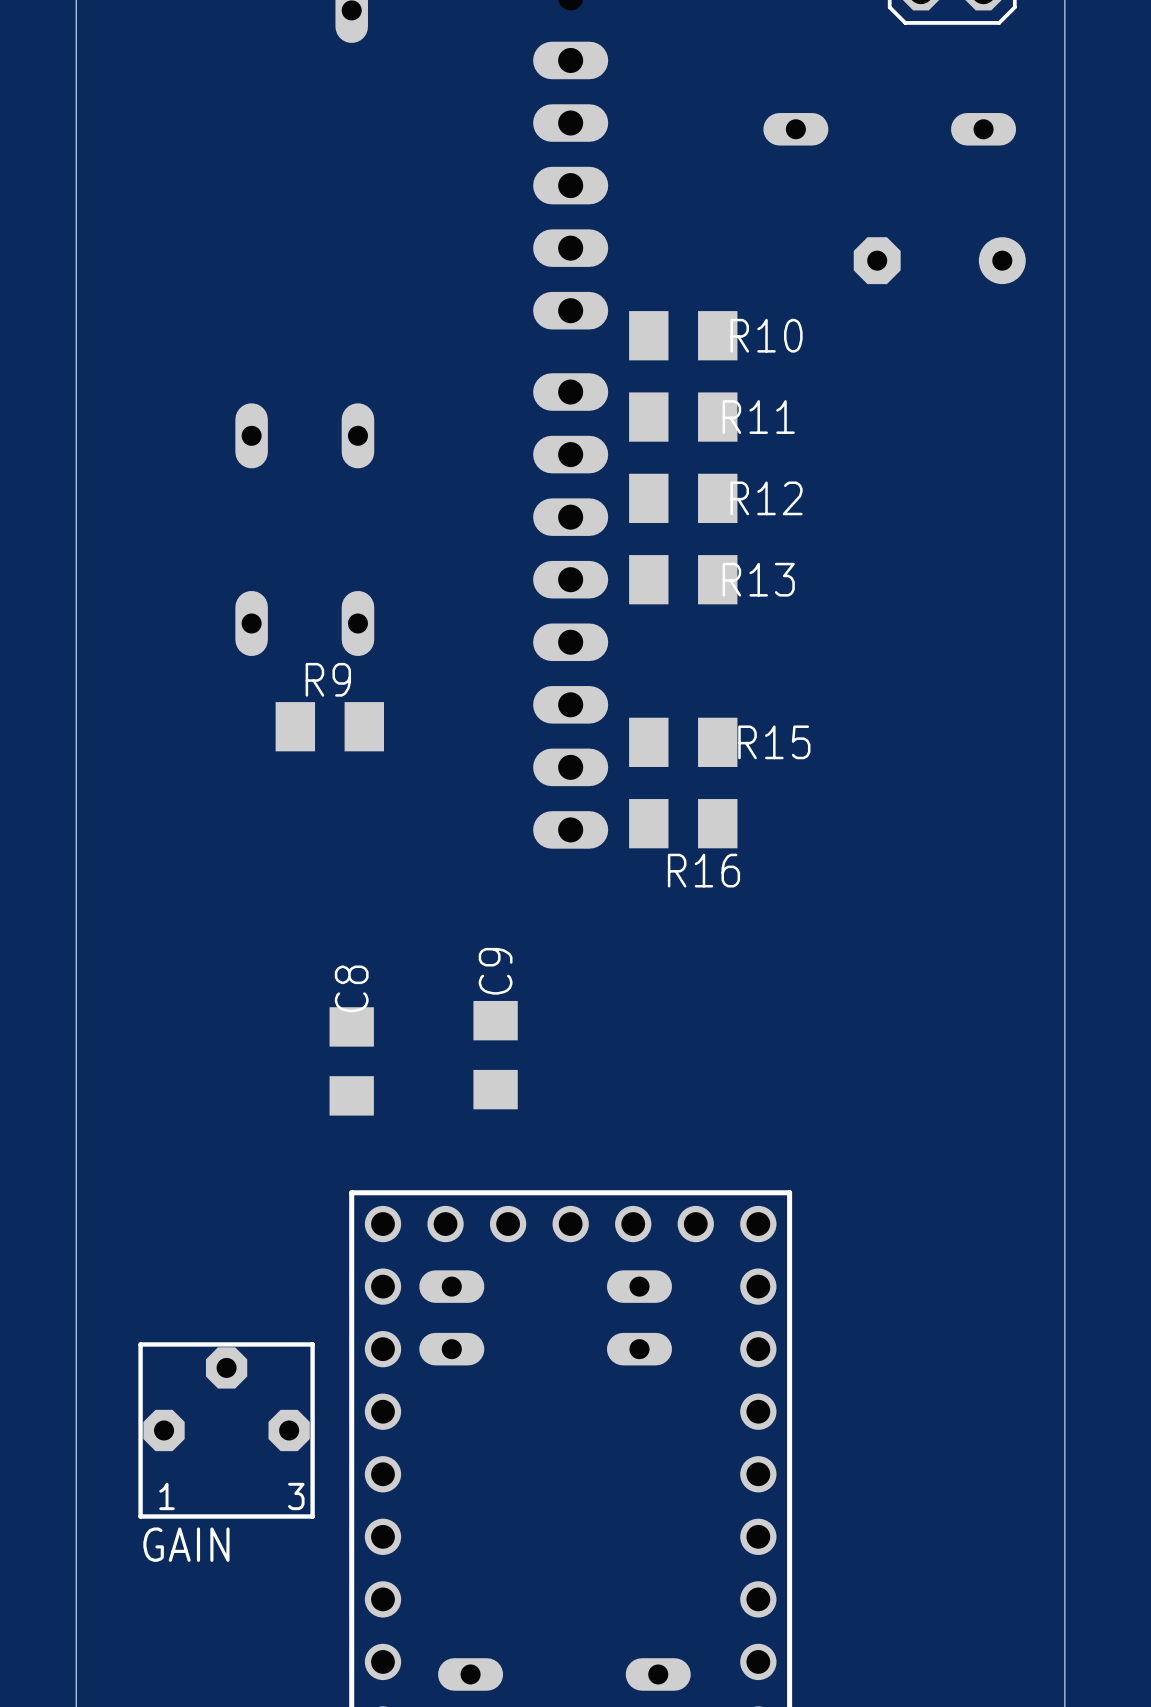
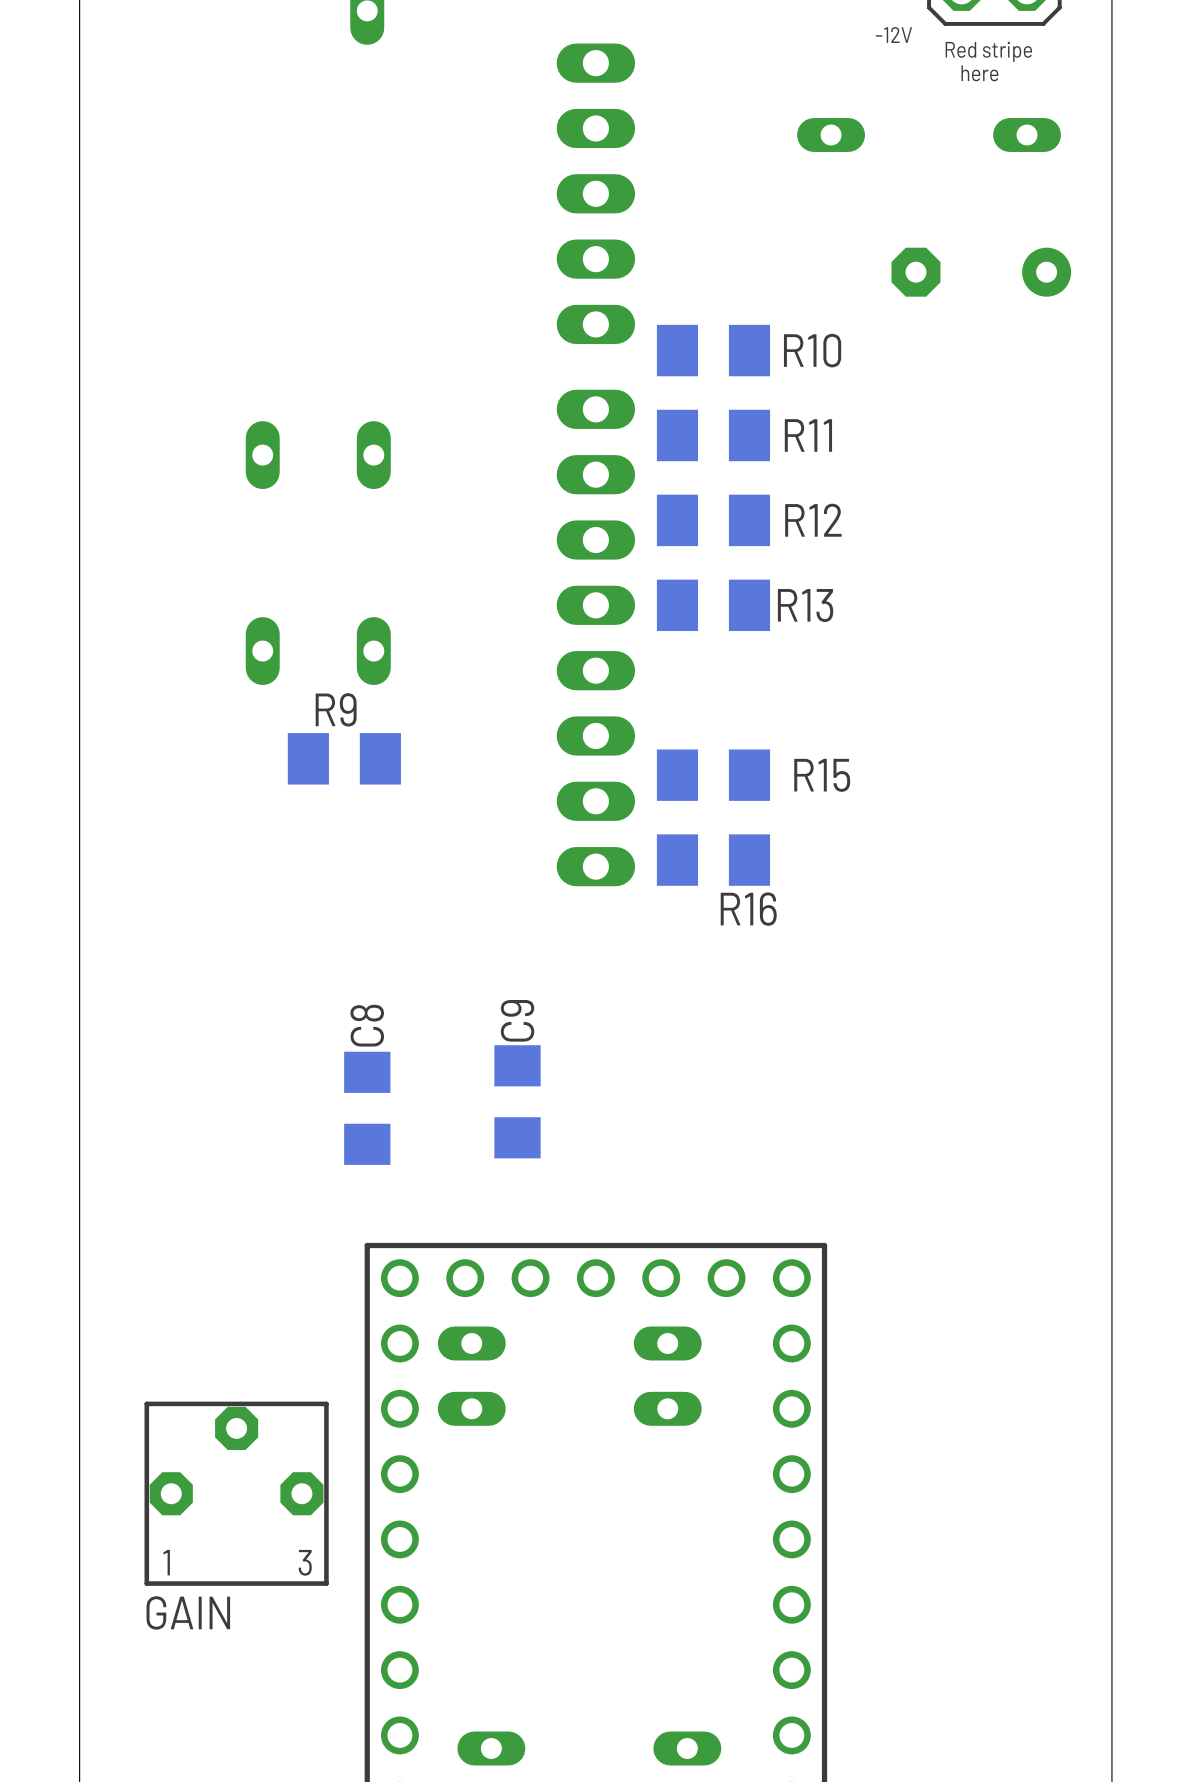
text: none -> -12V (893, 34)
text: none -> Red stripe (988, 51)
text: none -> here (979, 73)

